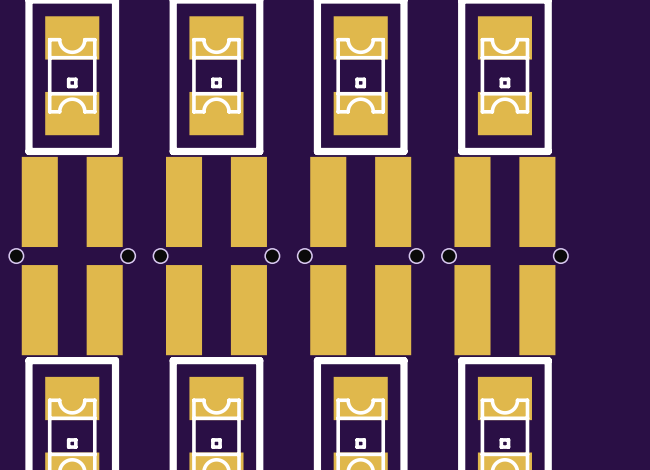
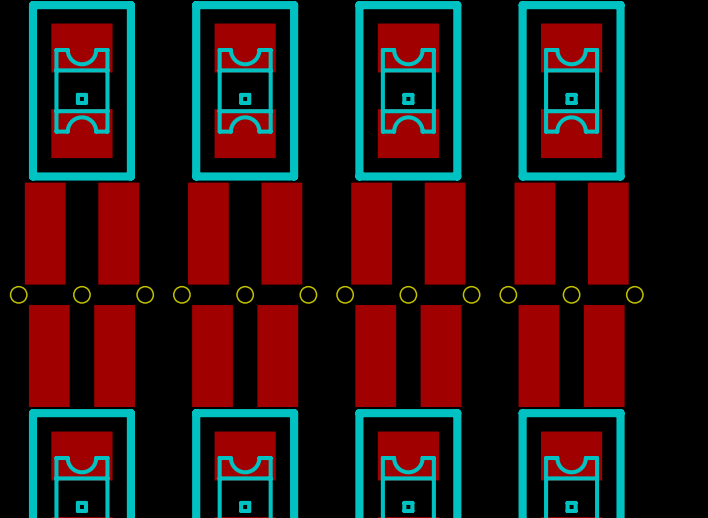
part footprint: [9, 248, 136, 356] -> [10, 286, 154, 408]
part footprint: [153, 248, 280, 356] -> [173, 286, 317, 408]
part footprint: [297, 248, 424, 356] -> [336, 286, 480, 408]
part footprint: [441, 248, 569, 356] -> [500, 286, 643, 408]

